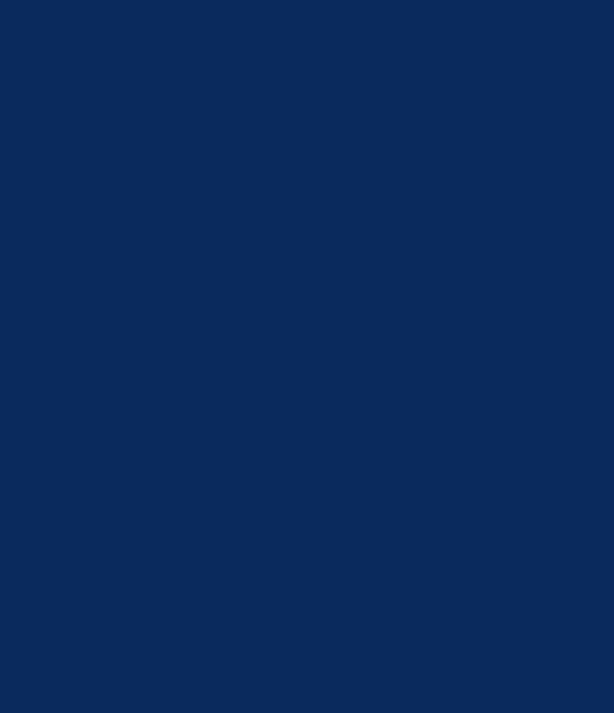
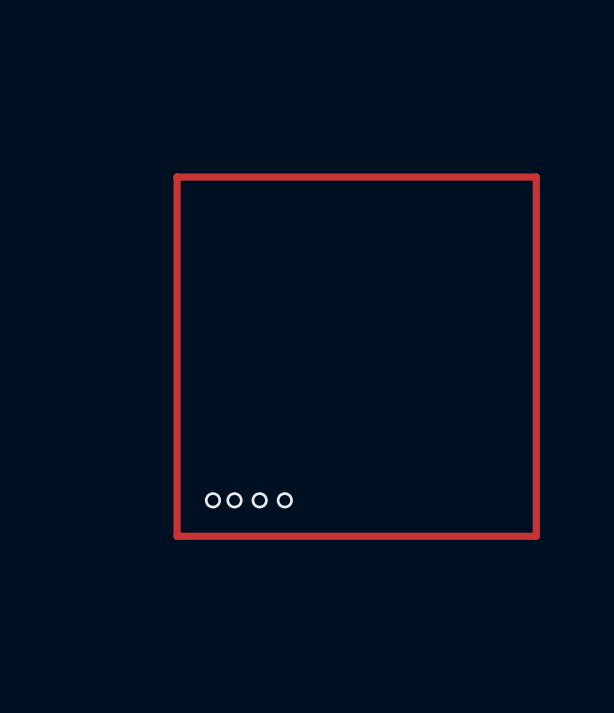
track: none -> (177, 177) (536, 177) (536, 536) (177, 536) (177, 177)
via: none -> (212, 500)
via: none -> (234, 500)
via: none -> (259, 500)
via: none -> (284, 500)

